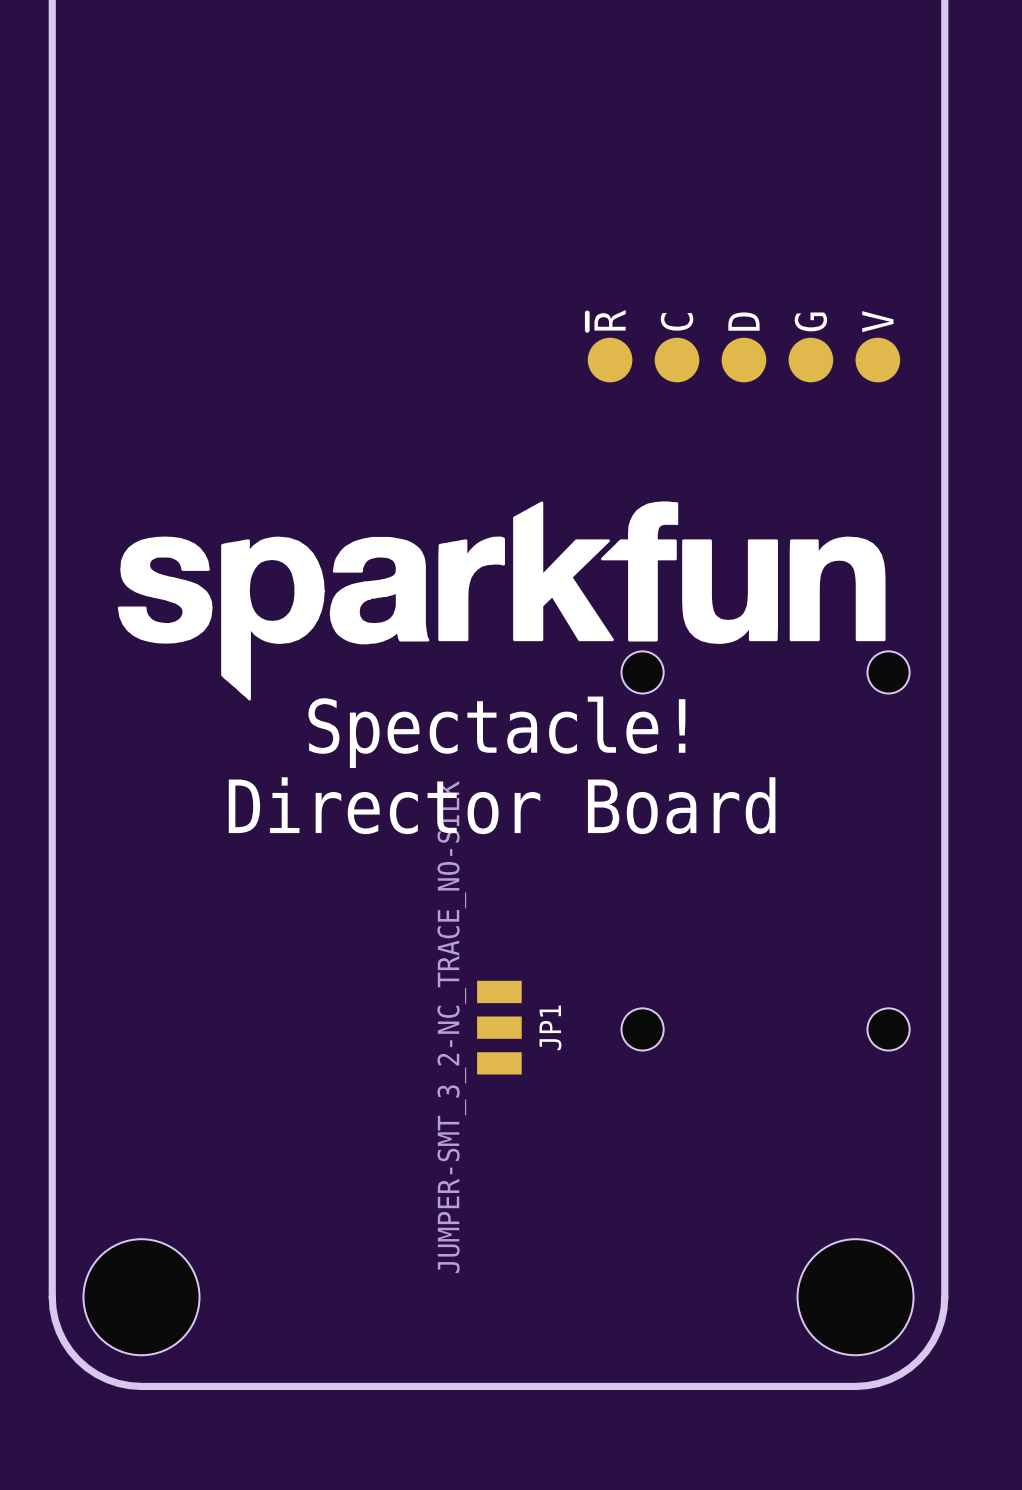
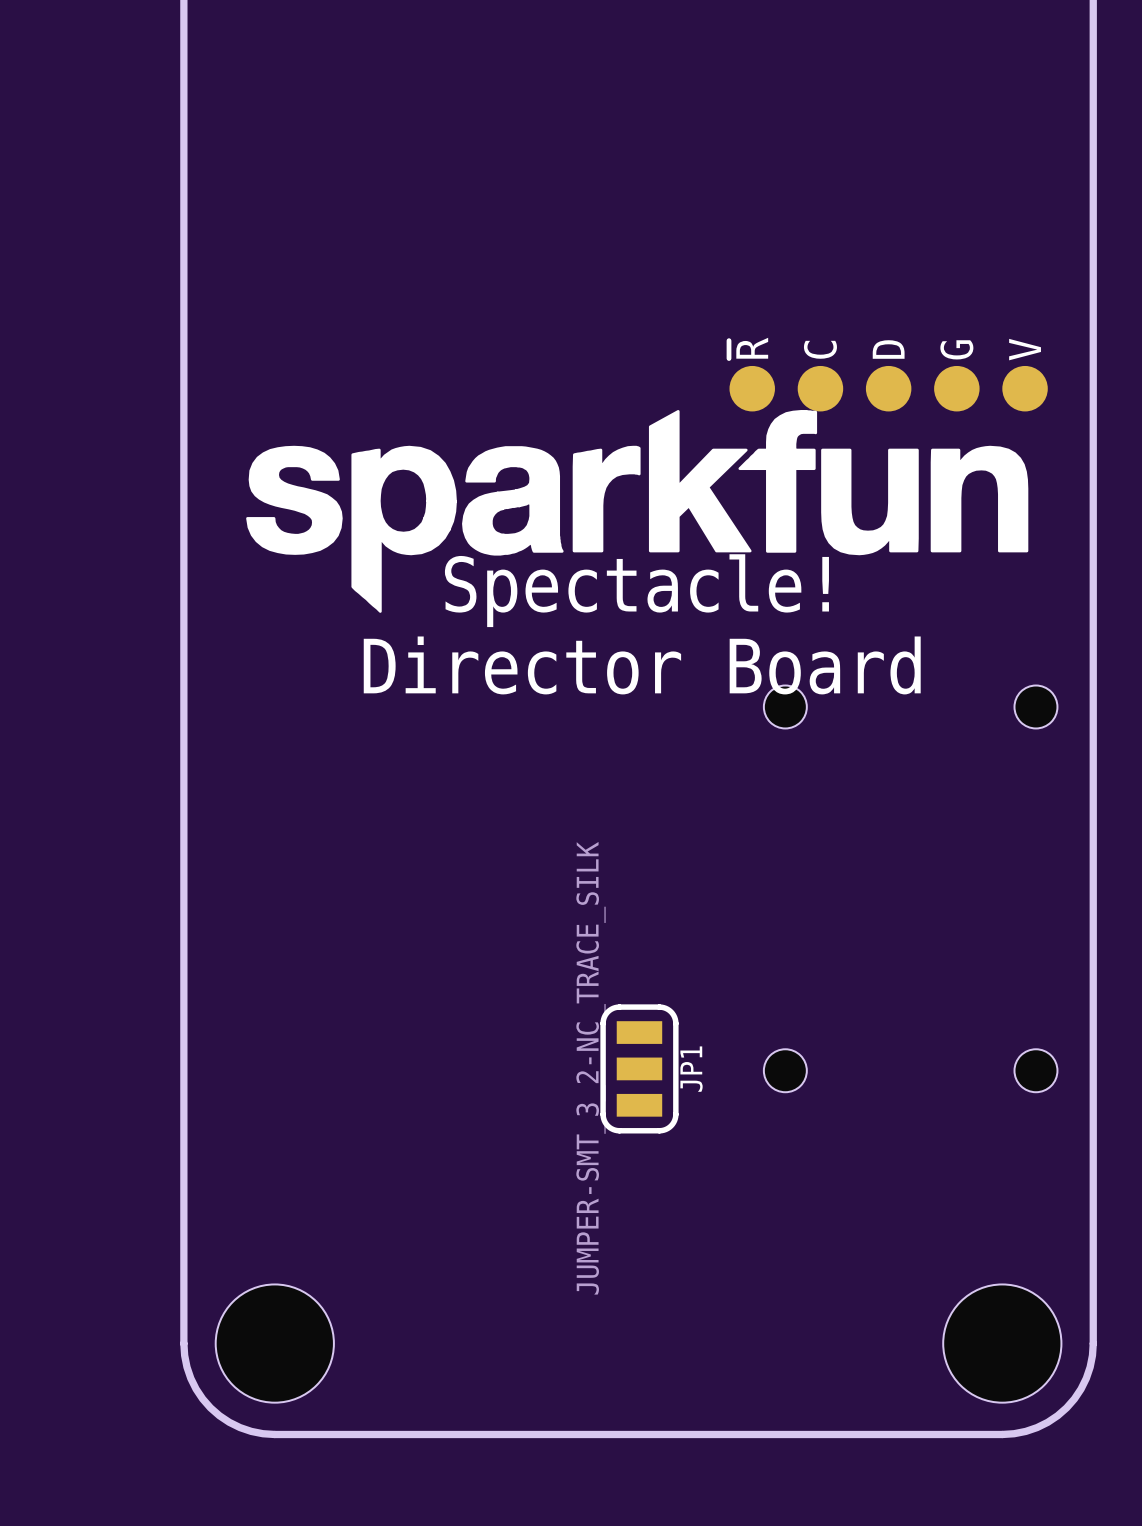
drawing position: (501, 600) -> (637, 511)
text position: Spectacle! (496, 732) -> Spectacle! (636, 590)
text position: Director Board (502, 805) -> Director Board (642, 665)
JP1 footprint: [477, 980, 522, 1075] -> [600, 1004, 679, 1134]
JP1 value: JUMPER-SMT_3_2-NC_TRACE_NO-SILK (451, 1027) -> JUMPER-SMT_3_2-NC_TRACE_SILK (590, 1068)

